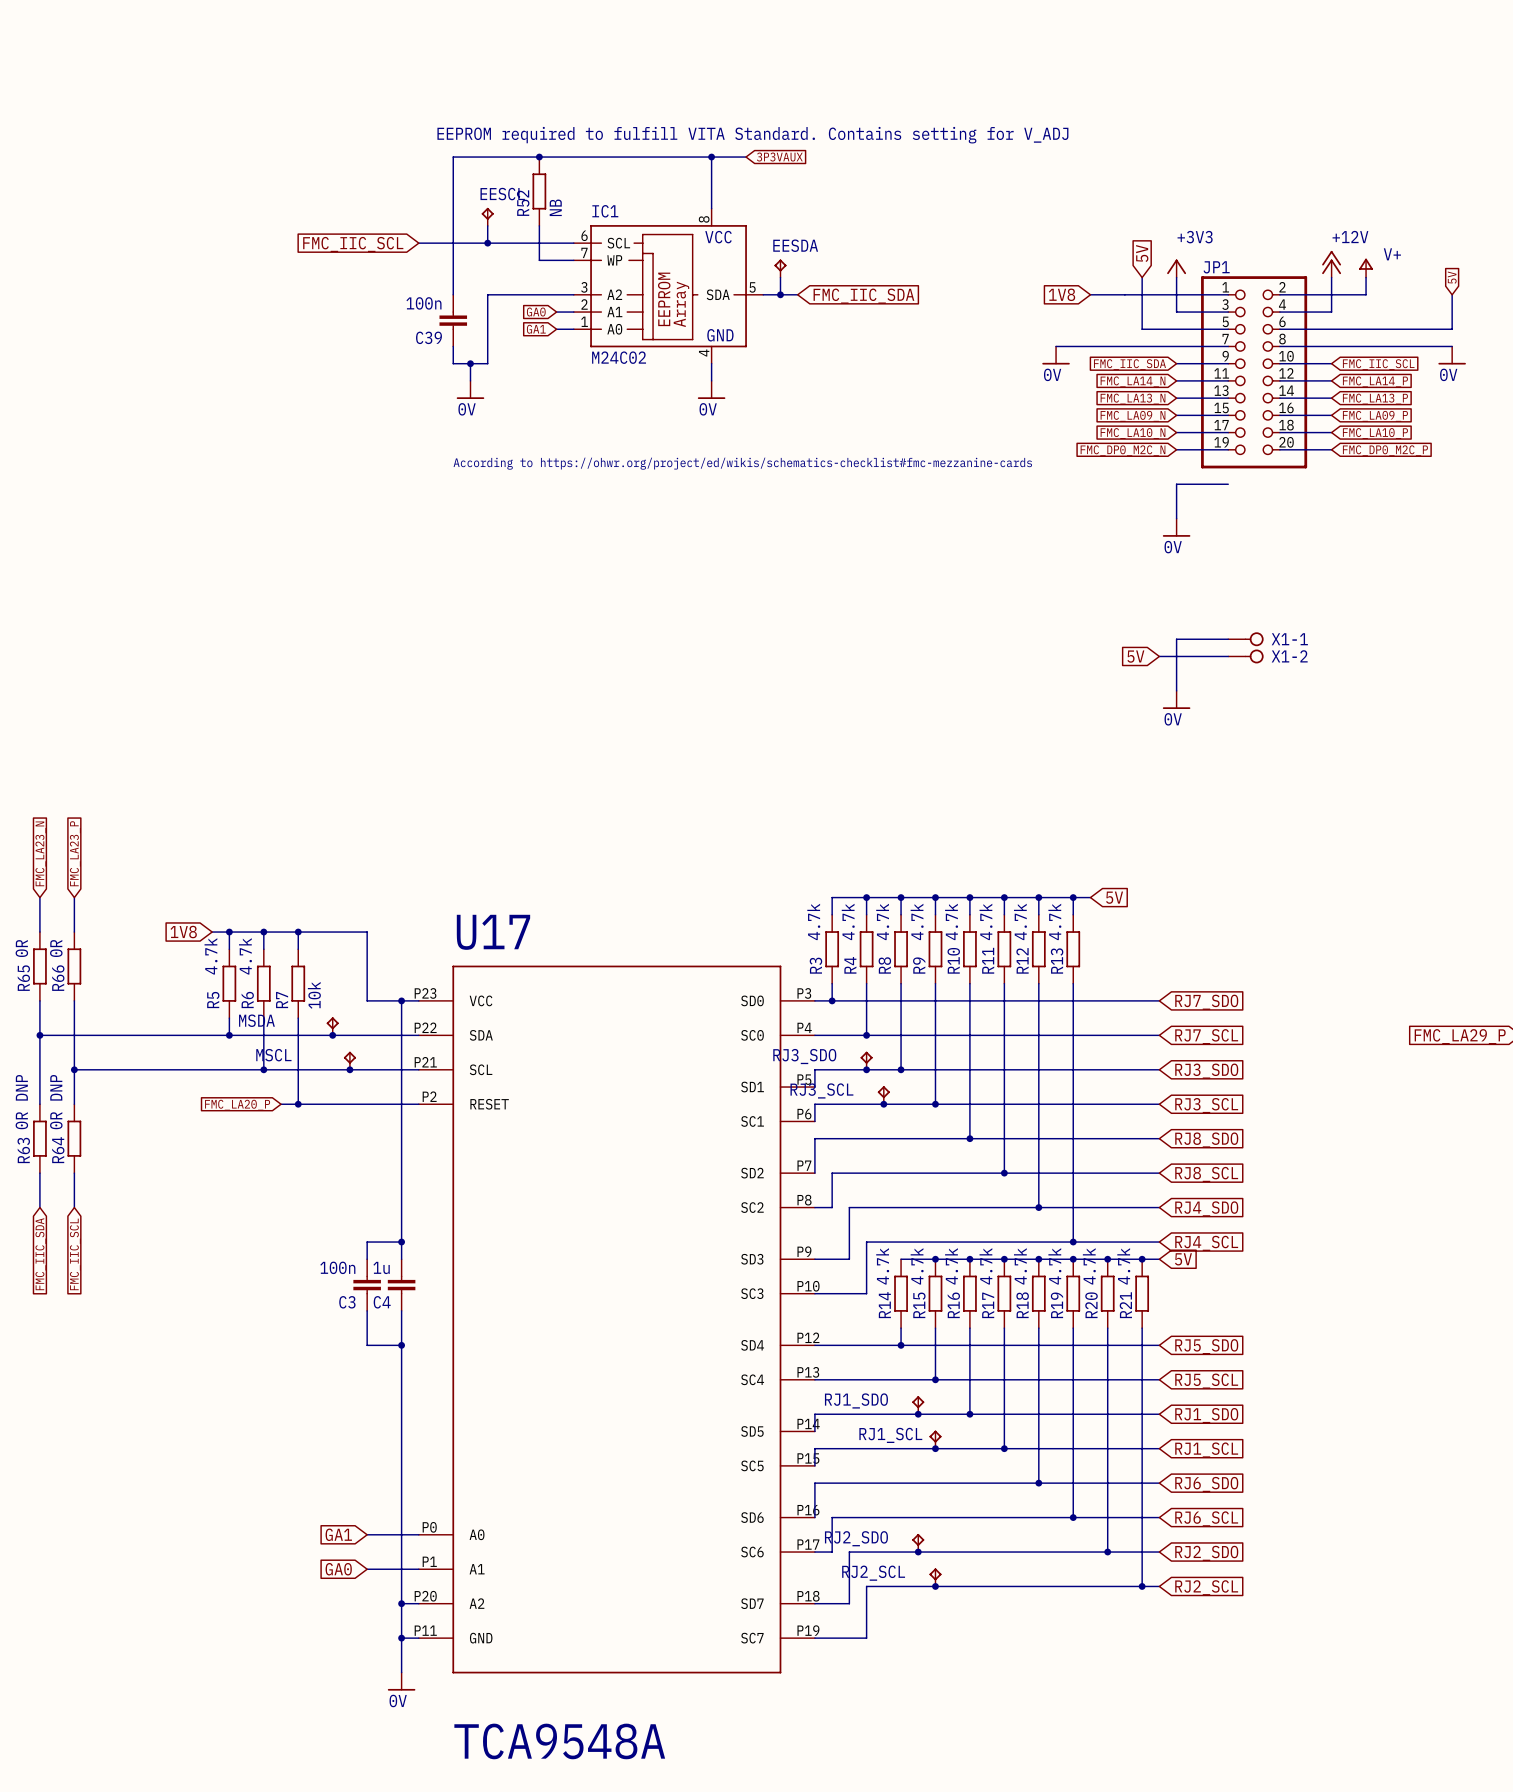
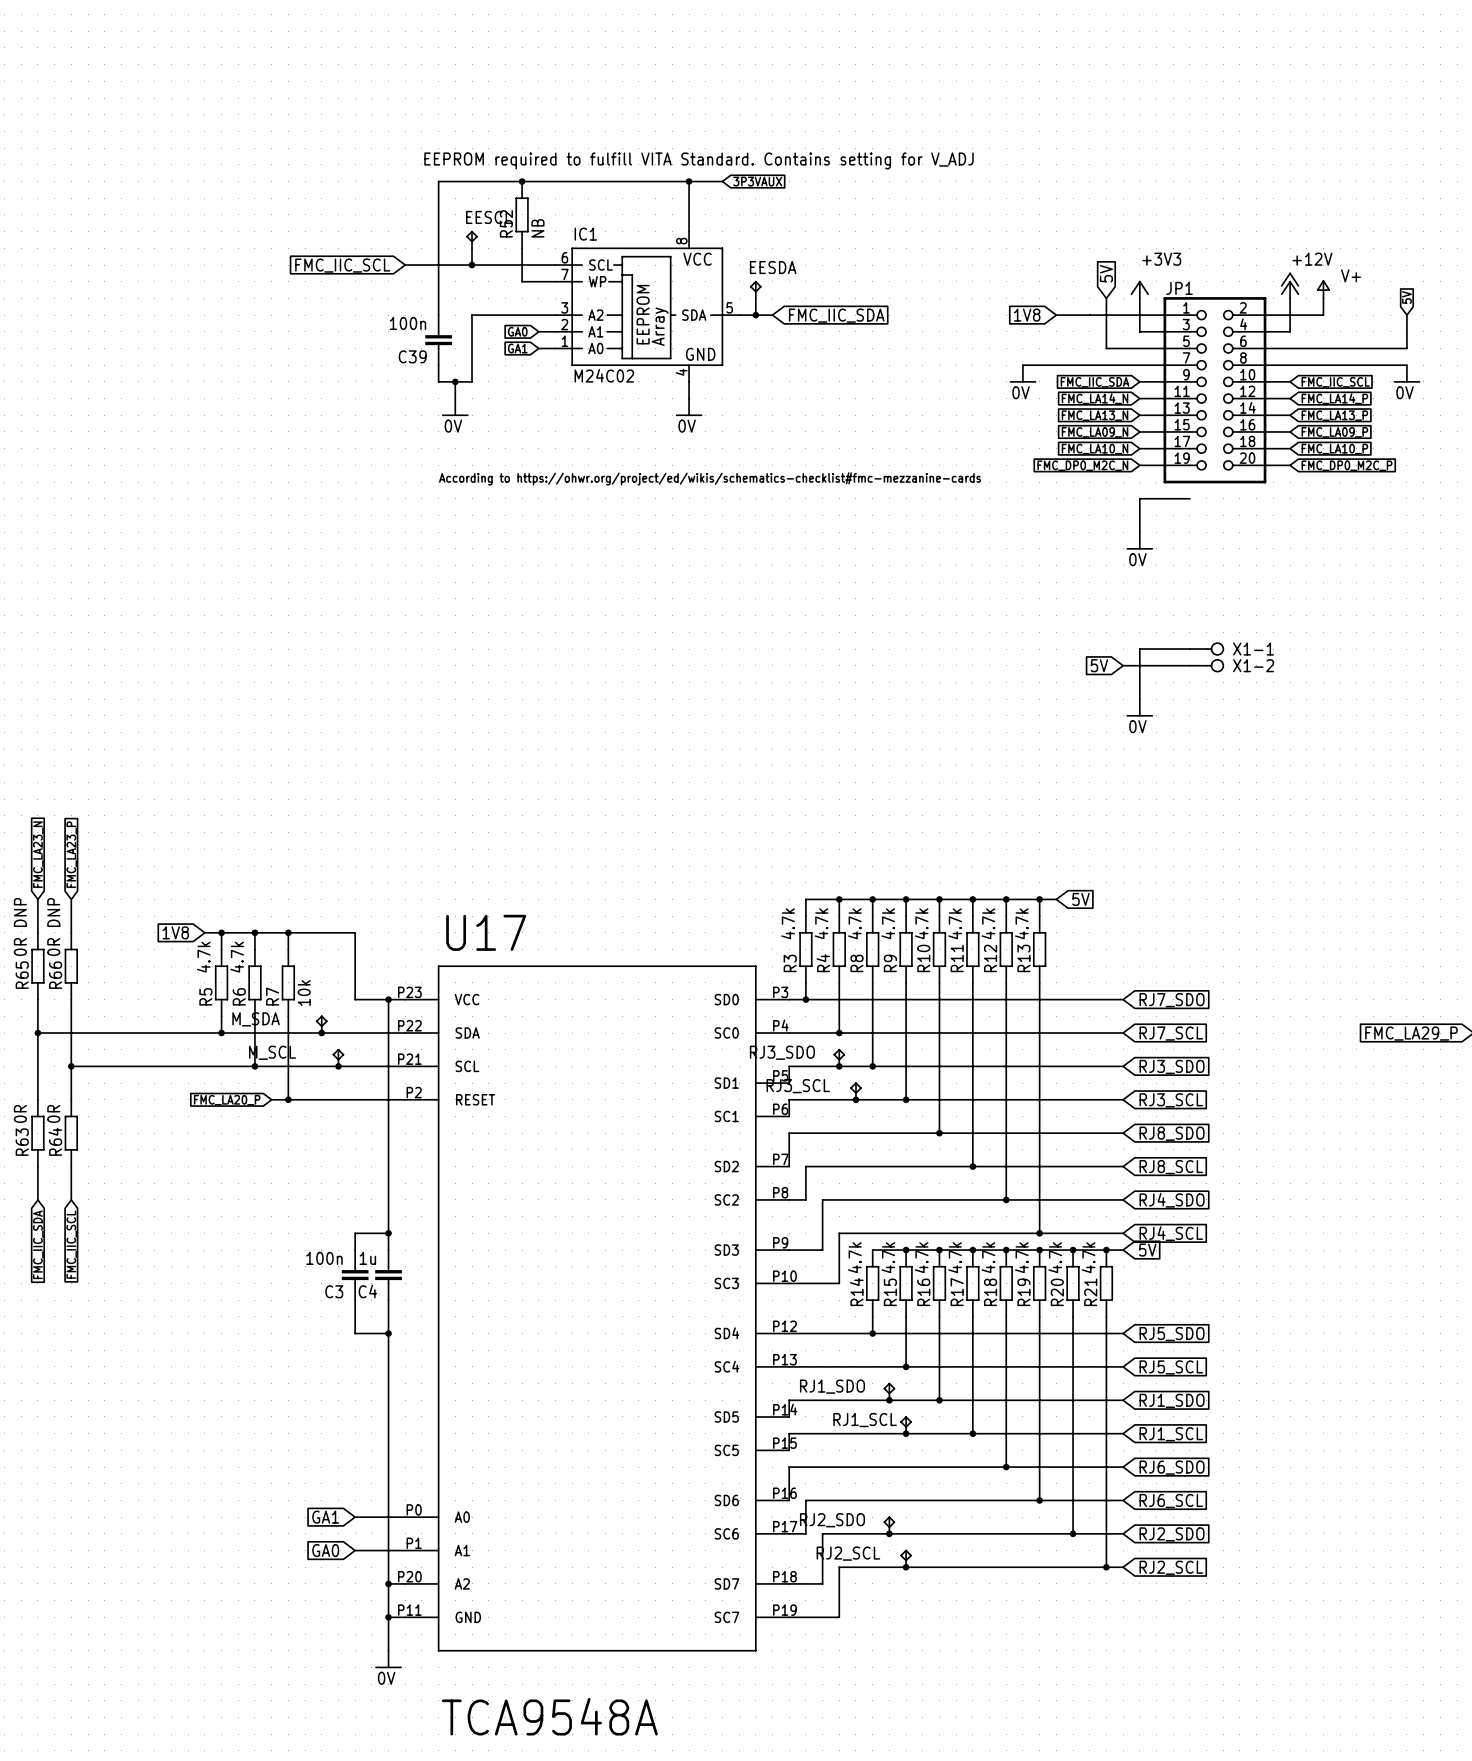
R65 value: 0R (21, 948) -> 0R DNP (20, 926)
R66 value: 0R (56, 948) -> 0R DNP (53, 926)
MSDA name: MSDA (256, 1020) -> M_SDA (256, 1019)
MSCL name: MSCL (273, 1055) -> M_SCL (272, 1052)
R63 value: 0R DNP (21, 1102) -> 0R (20, 1113)
R64 value: 0R DNP (56, 1102) -> 0R (53, 1113)

